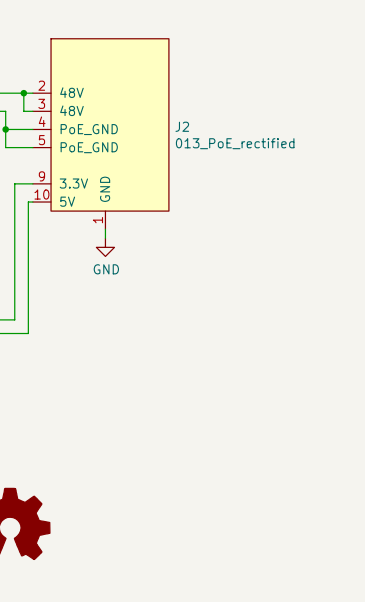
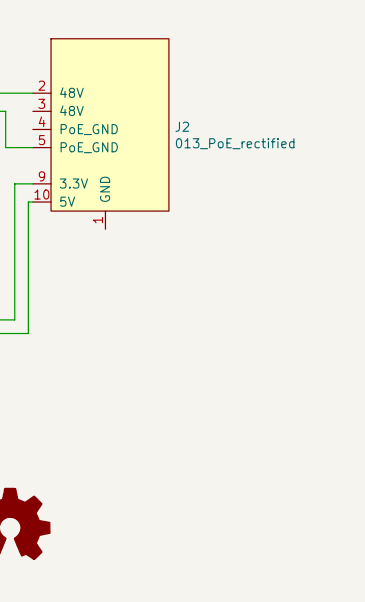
wire: (23, 93) (23, 111) (32, 111) -> none
junction: (23, 93) -> none
wire: (5, 129) (32, 129) -> none
junction: (5, 129) -> none
wire: (105, 229) (105, 238) -> none
power symbol: GND (105, 247) -> none

